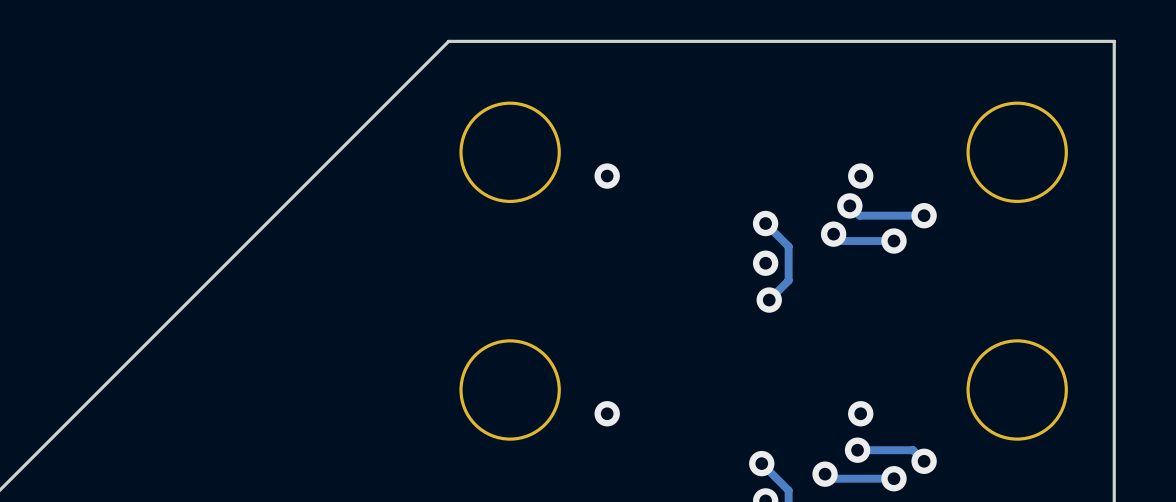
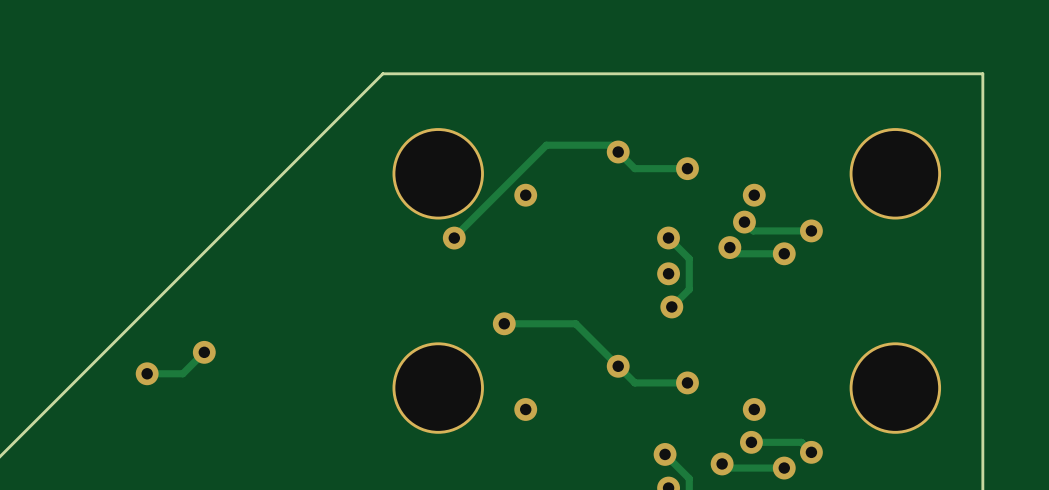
via: none -> (618, 152)
track: none -> (687, 168) (634, 168) (611, 145) (546, 145) (454, 238)
via: none -> (687, 168)
via: none -> (454, 238)
track: none -> (504, 323) (575, 323) (634, 382) (687, 382)
via: none -> (504, 323)
track: none -> (204, 352) (182, 373) (147, 373)
via: none -> (204, 352)
via: none -> (618, 366)
via: none -> (147, 373)
via: none -> (687, 382)

